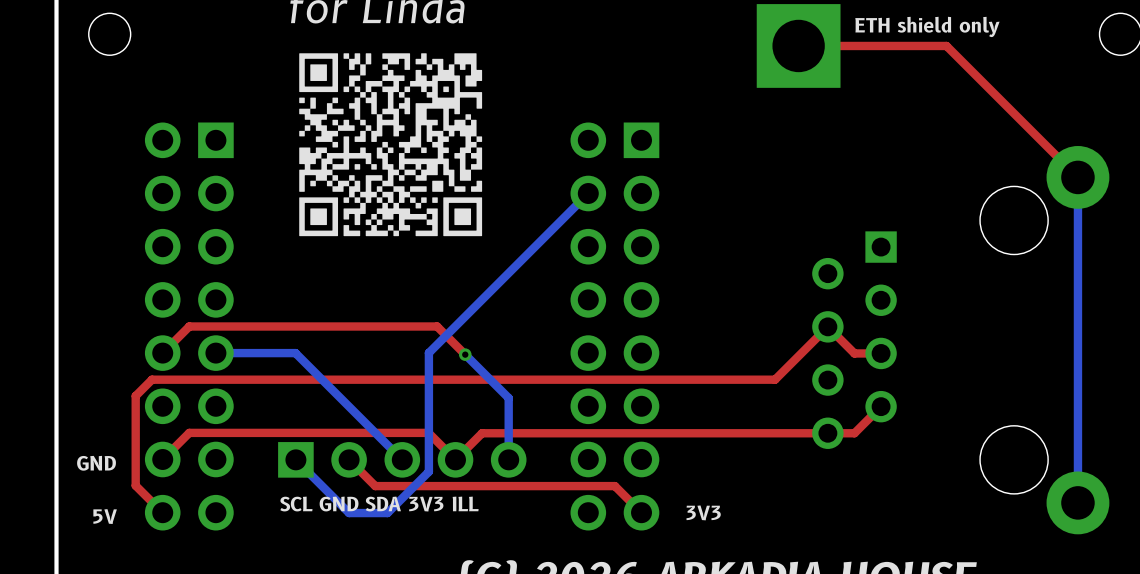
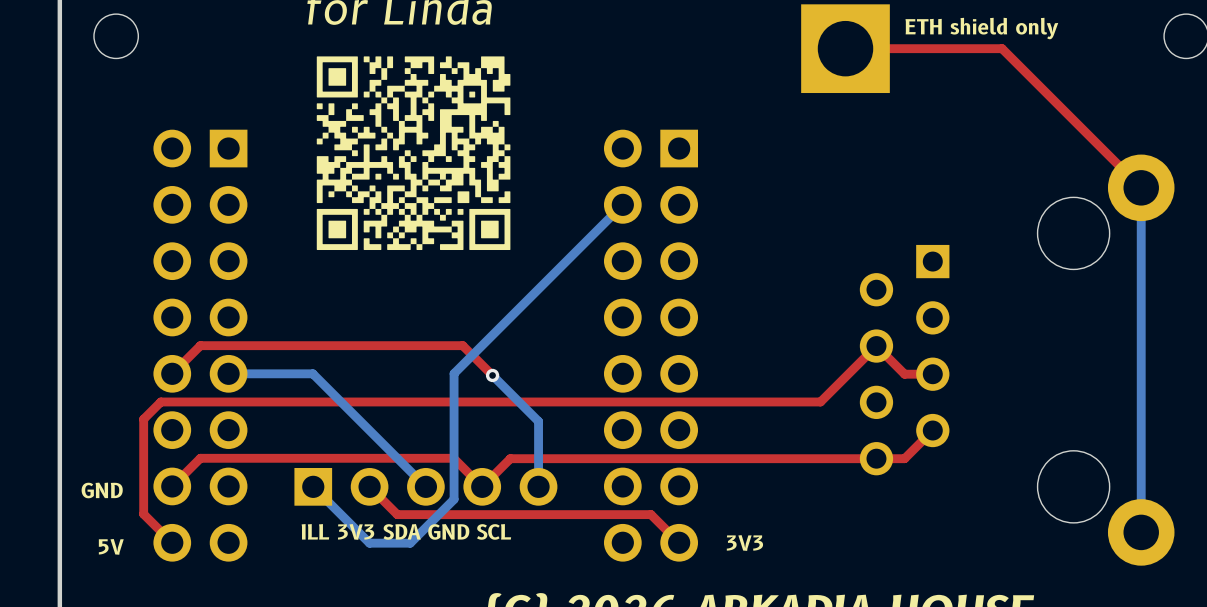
text: SCL GND SDA 3V3 ILL (379, 504) -> ILL 3V3 SDA GND SCL (406, 531)

